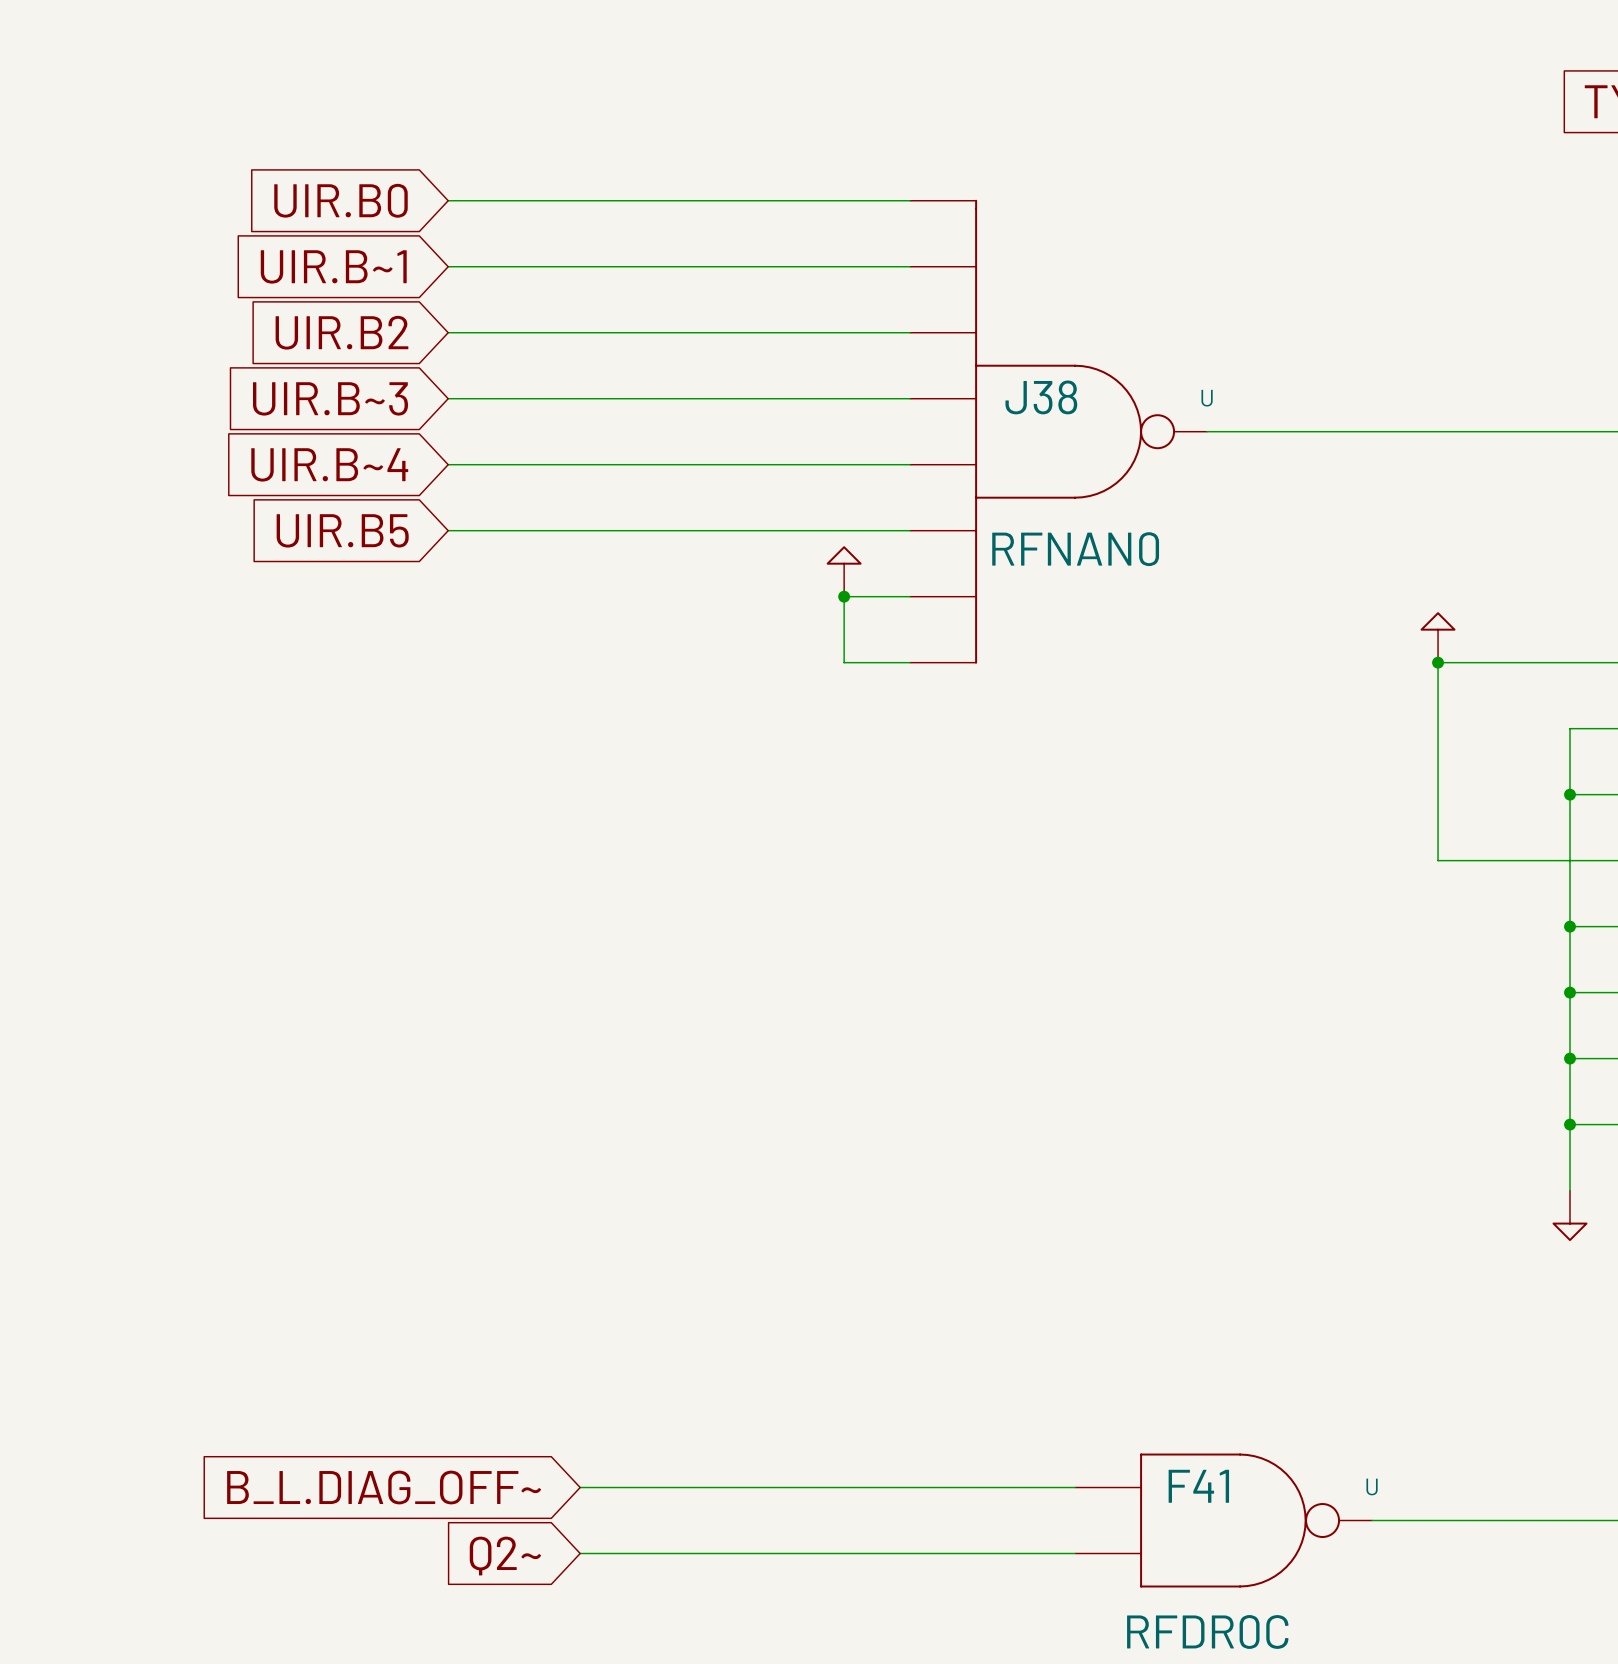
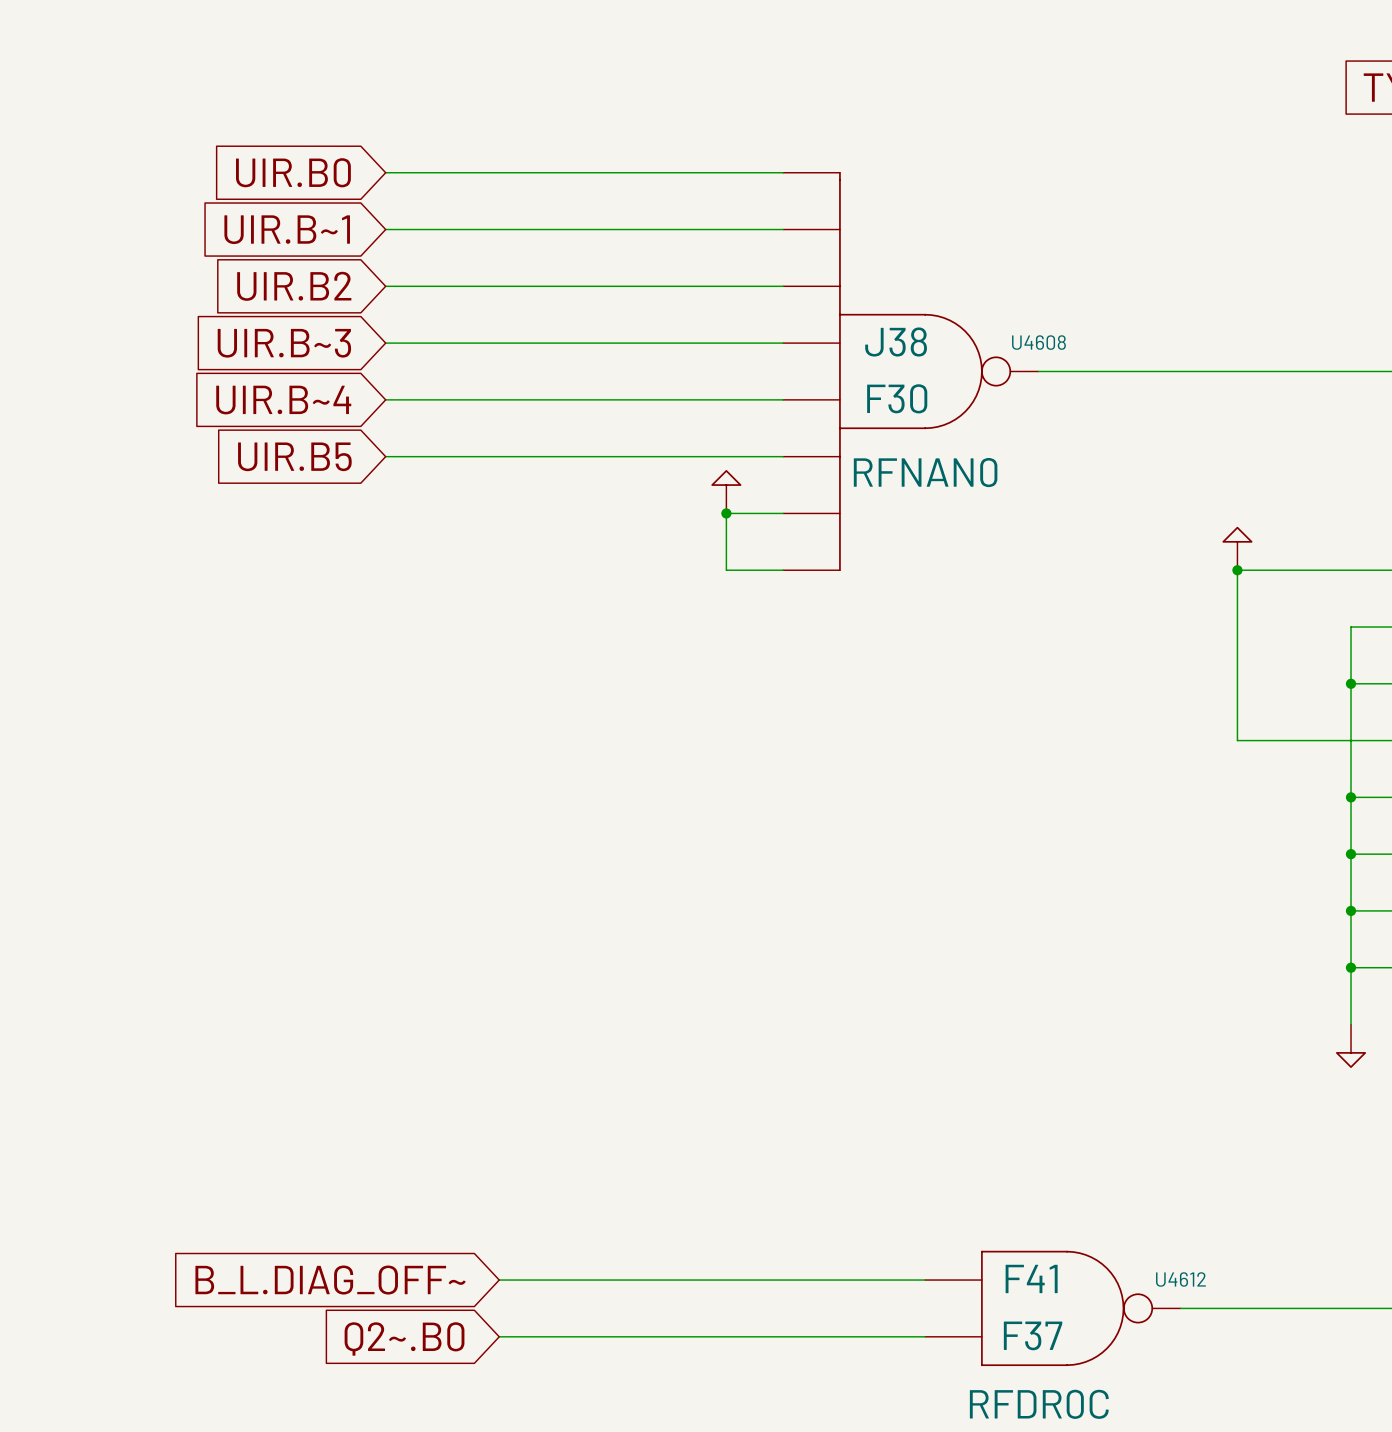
U name: U (1207, 398) -> U4608 (1038, 342)
U value: none -> F30 (897, 398)
U name: U (1372, 1486) -> U4612 (1180, 1279)
U value: none -> F37 (1033, 1335)
global label: Q2~ (505, 1556) -> Q2~.B0 (404, 1338)

